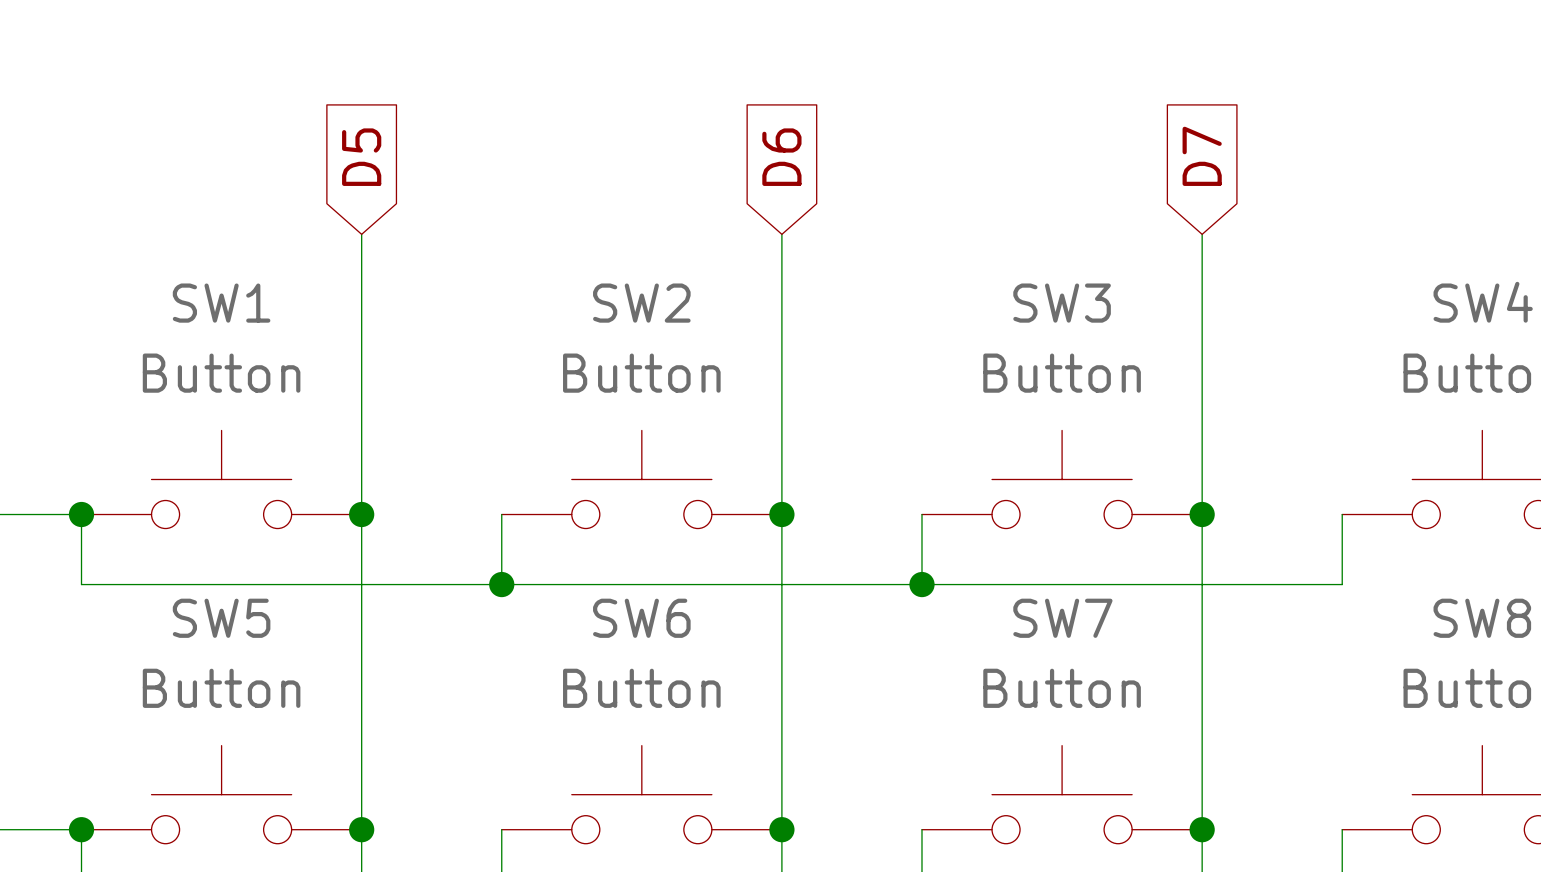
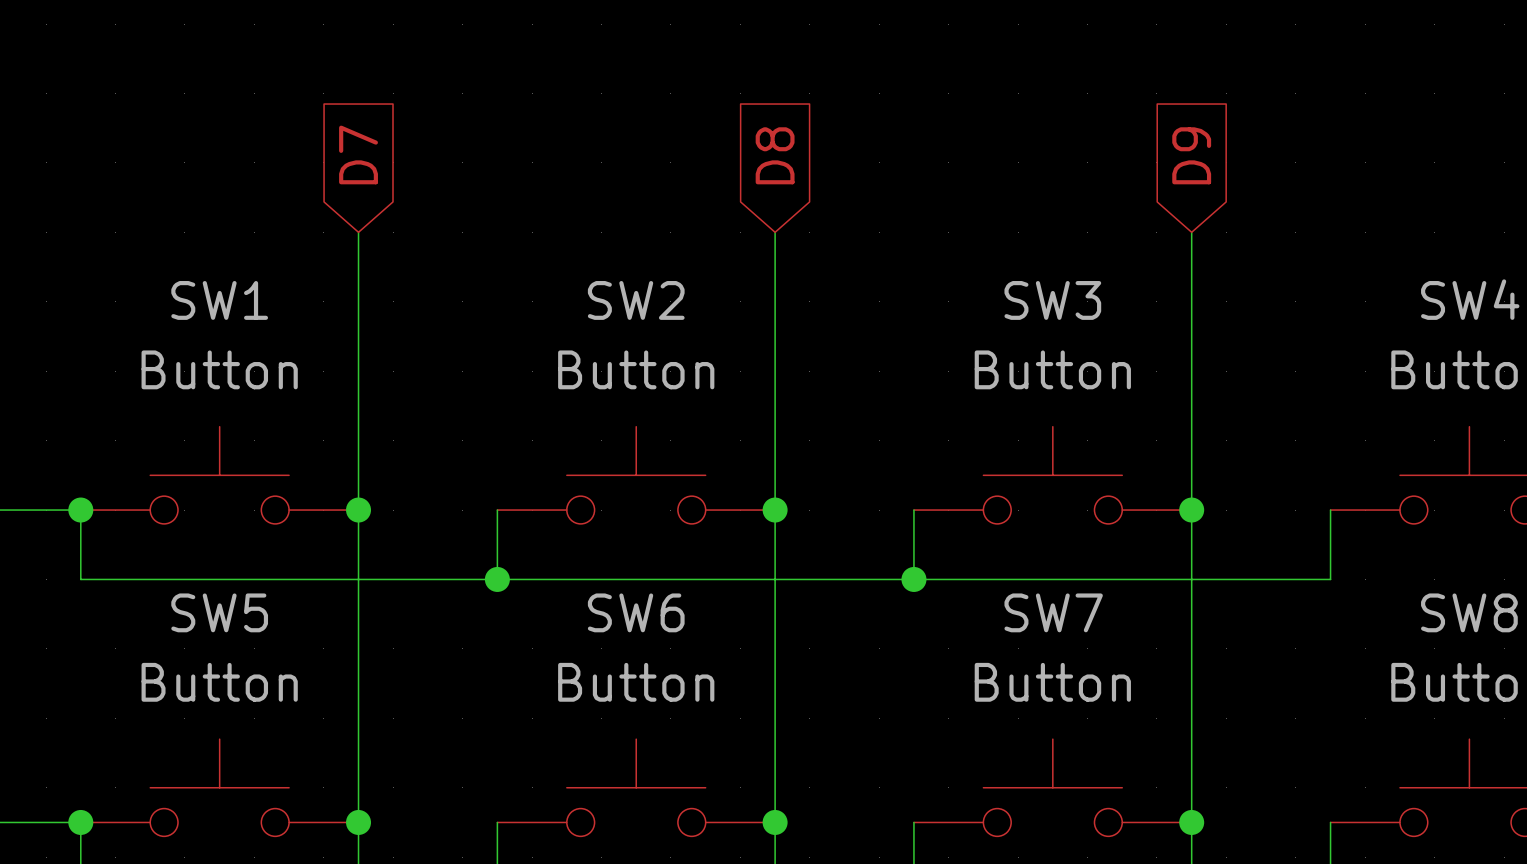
global label: D7 (1202, 156) -> D9 (1191, 155)
global label: D5 (361, 157) -> D7 (358, 154)
global label: D6 (781, 157) -> D8 (775, 155)

